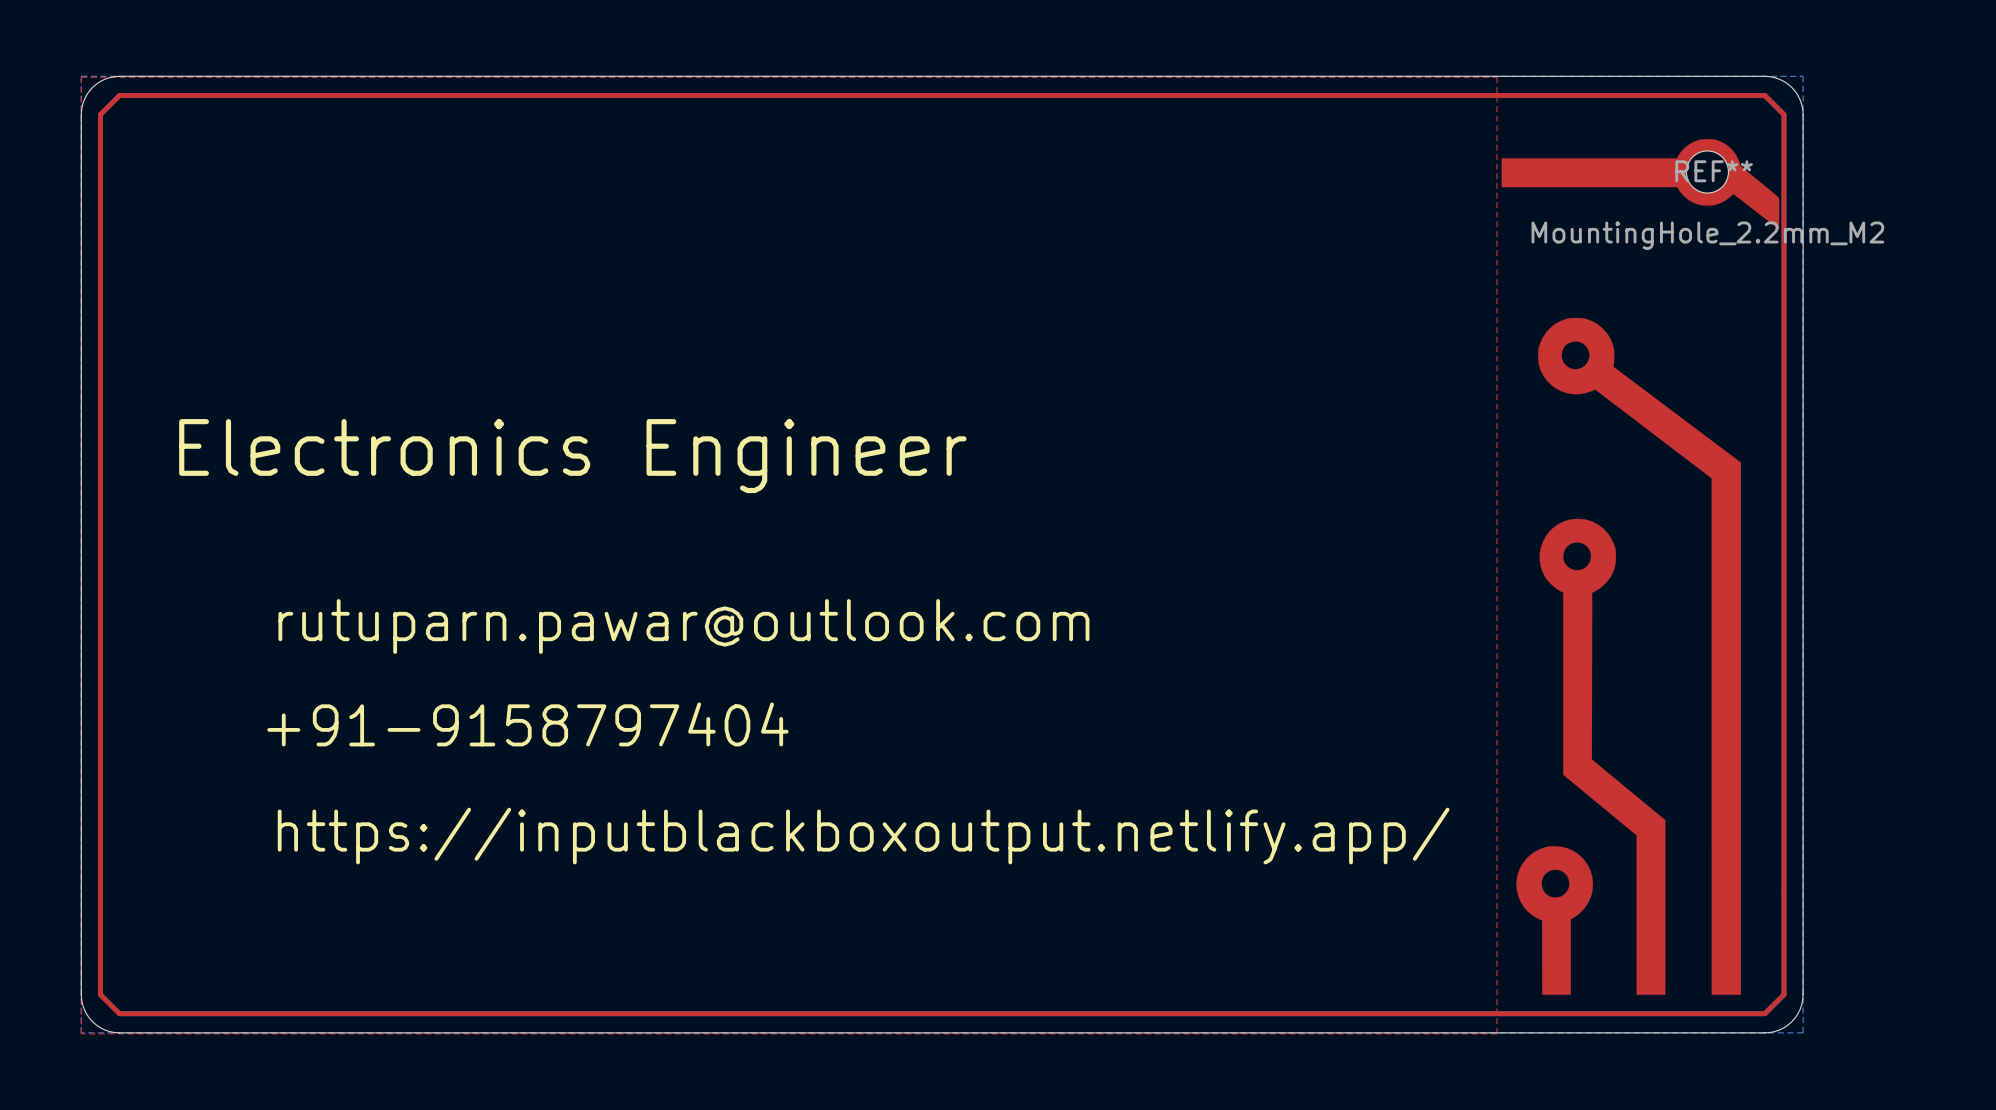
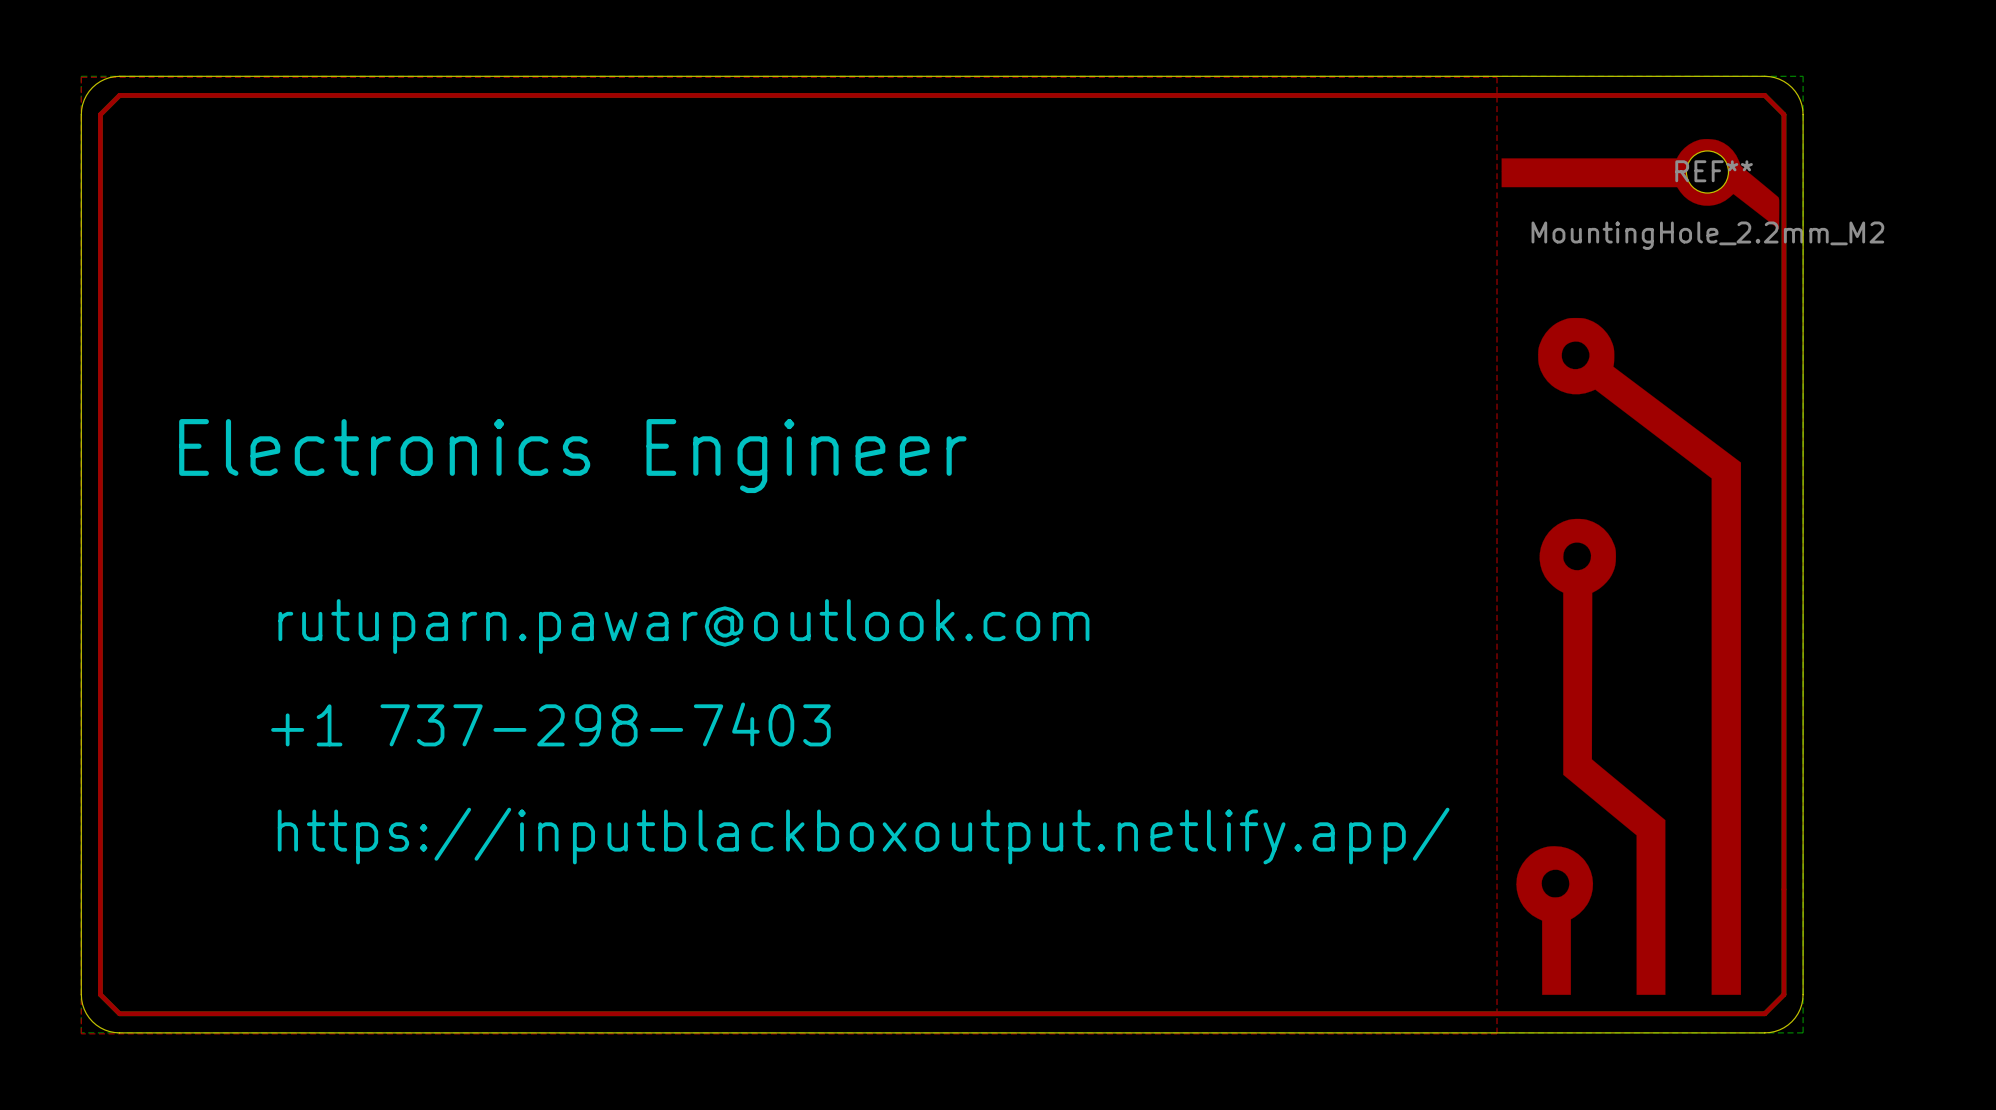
text: +91-9158797404 (527, 724) -> none
text: none -> +1 737-298-7403 (550, 724)

